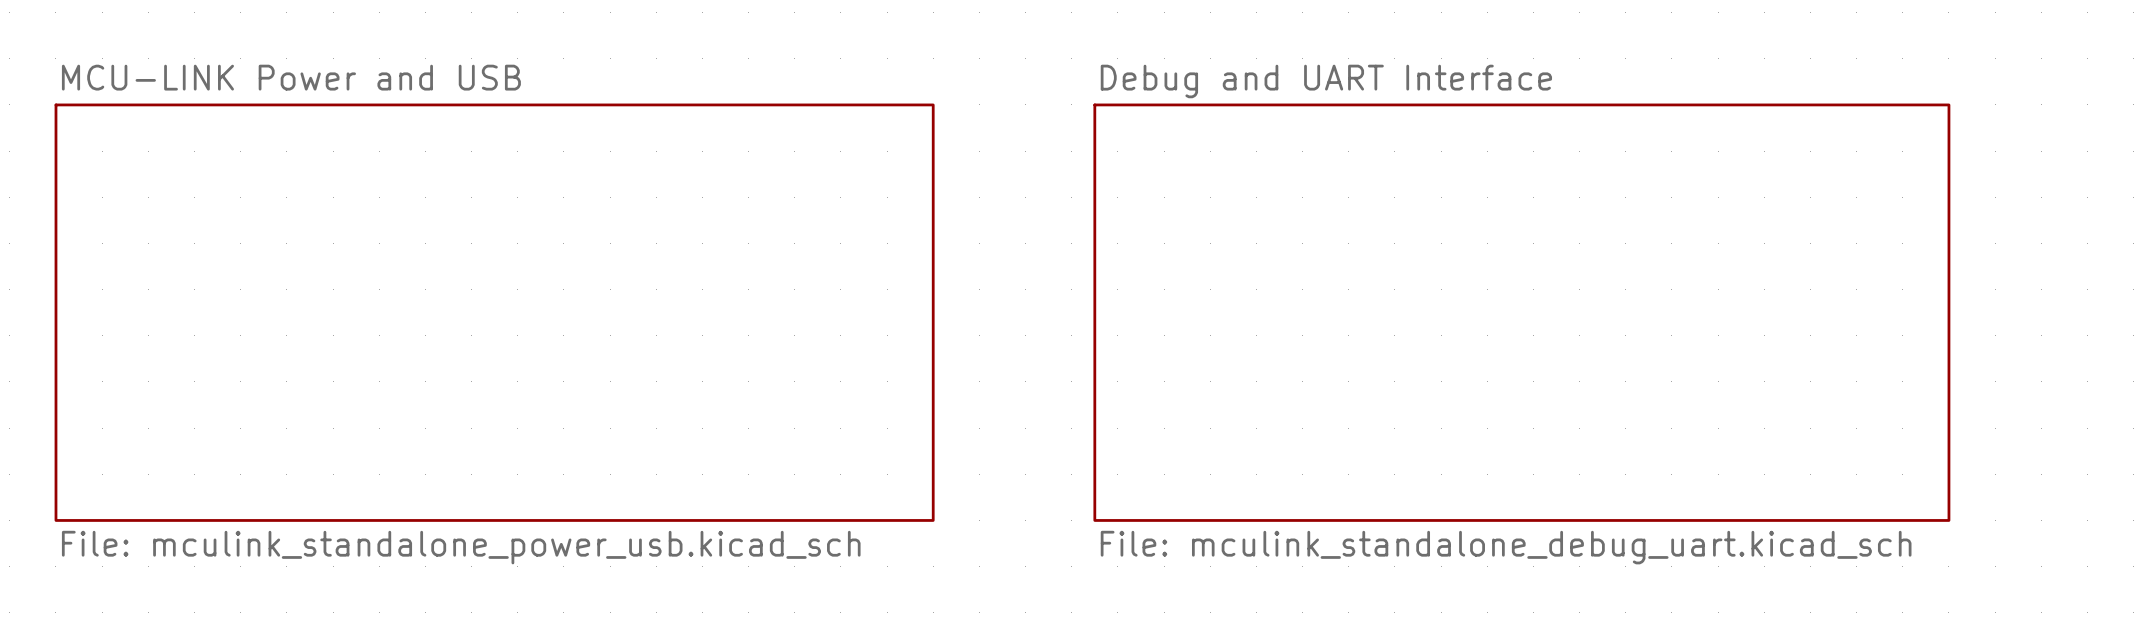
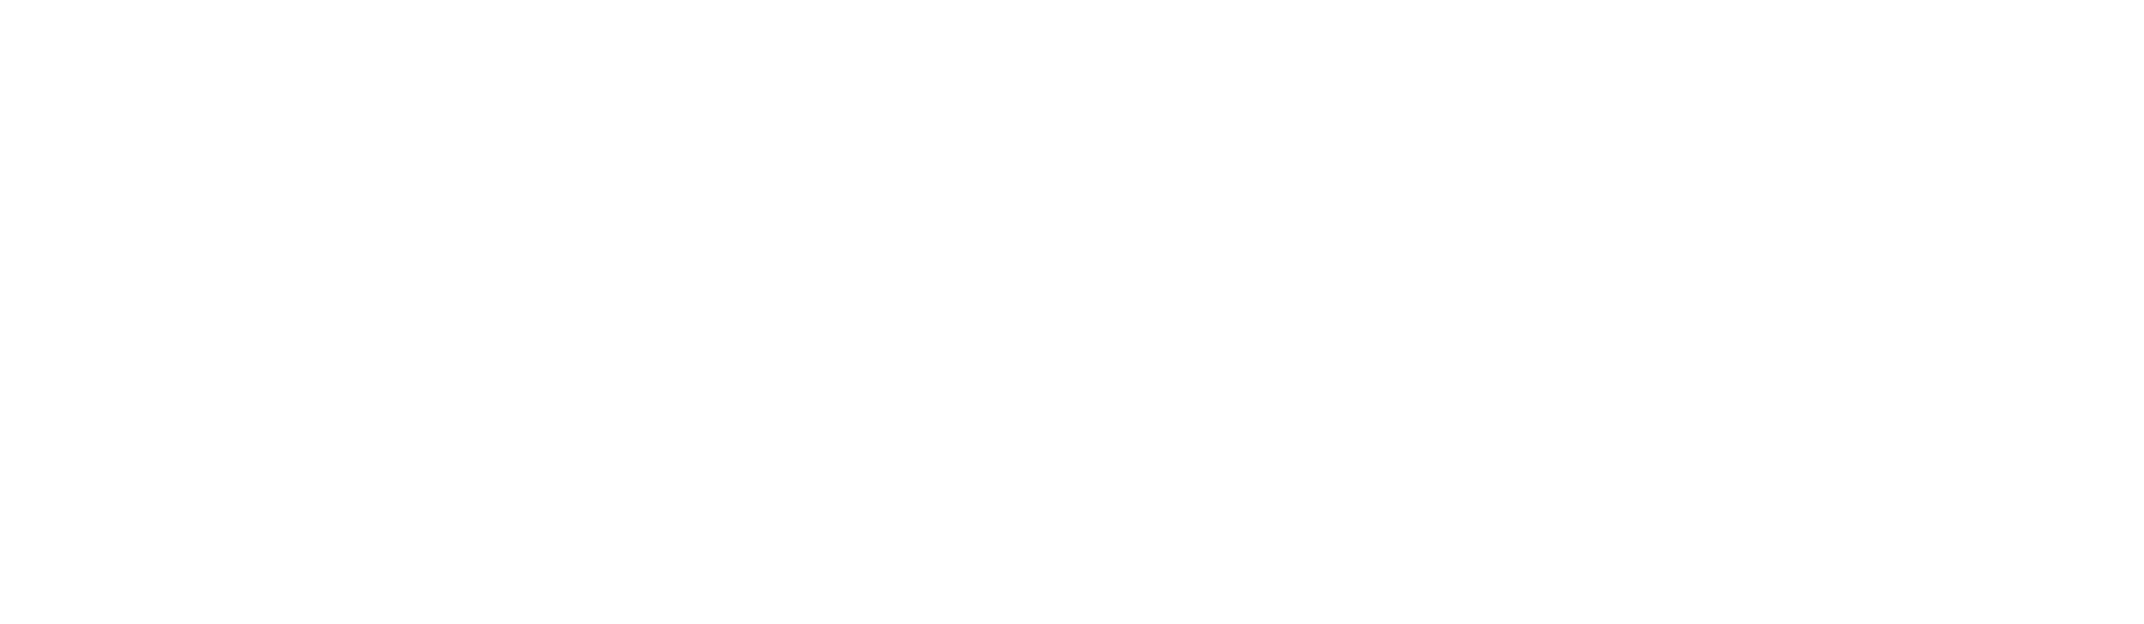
sheet MCU-LINK Power and USB: File: mculink_standalone_power_usb.kicad_sch (494, 312) -> none
sheet Debug and UART Interface: File: mculink_standalone_debug_uart.kicad_sch (1521, 312) -> none

